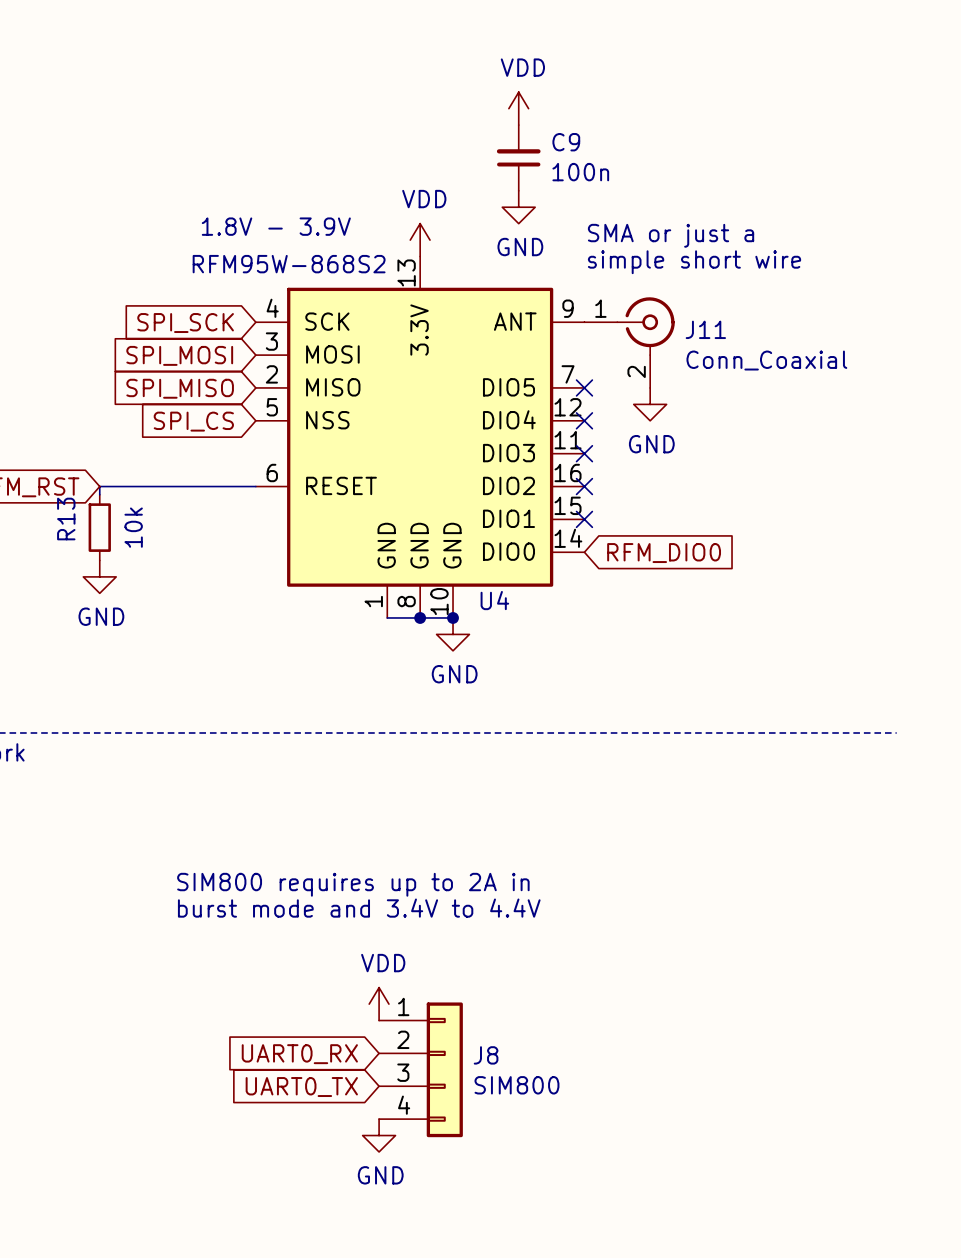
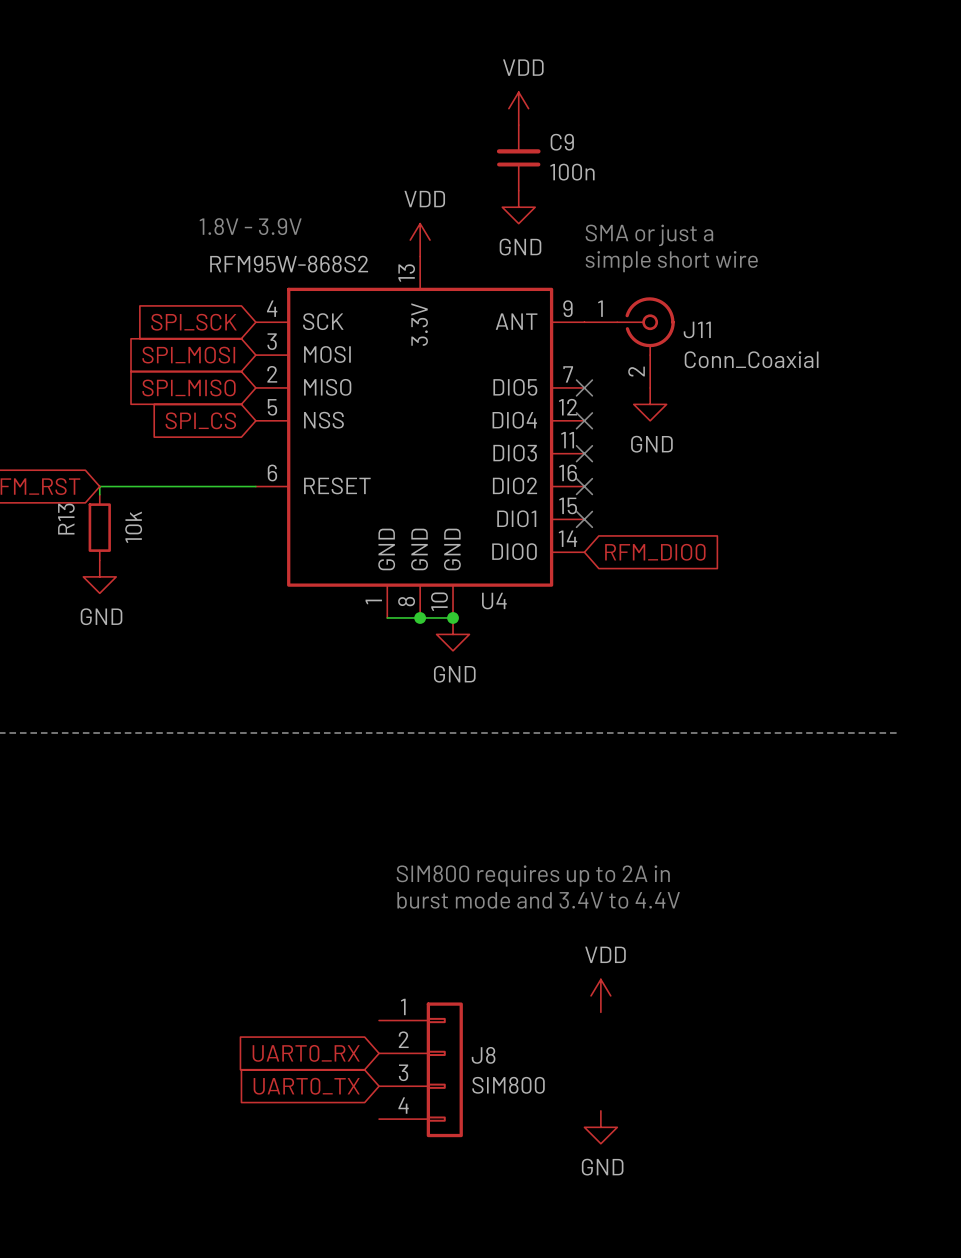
text position: SIM800 requires up to 2A in (353, 884) -> SIM800 requires up to 2A in (533, 875)
text position: burst mode and 3.4V to 4.4V (359, 908) -> burst mode and 3.4V to 4.4V (538, 900)
power symbol position: VDD (379, 1004) -> VDD (600, 995)
power symbol position: GND (379, 1135) -> GND (600, 1127)

